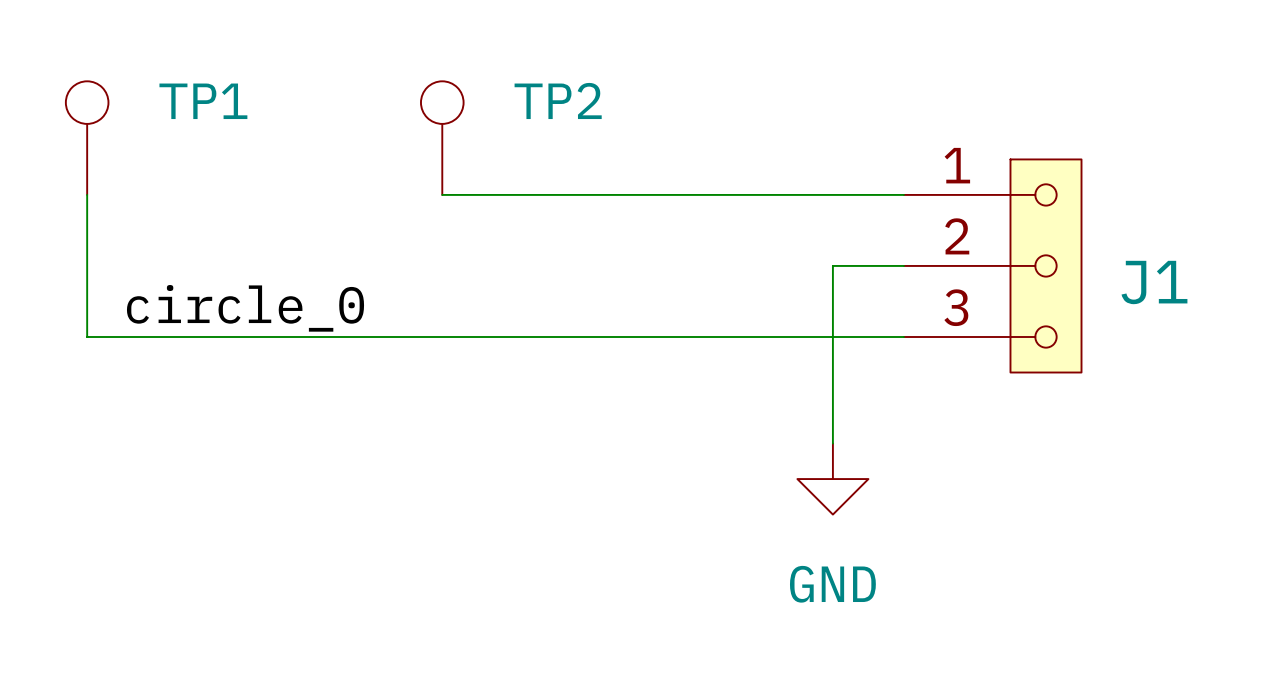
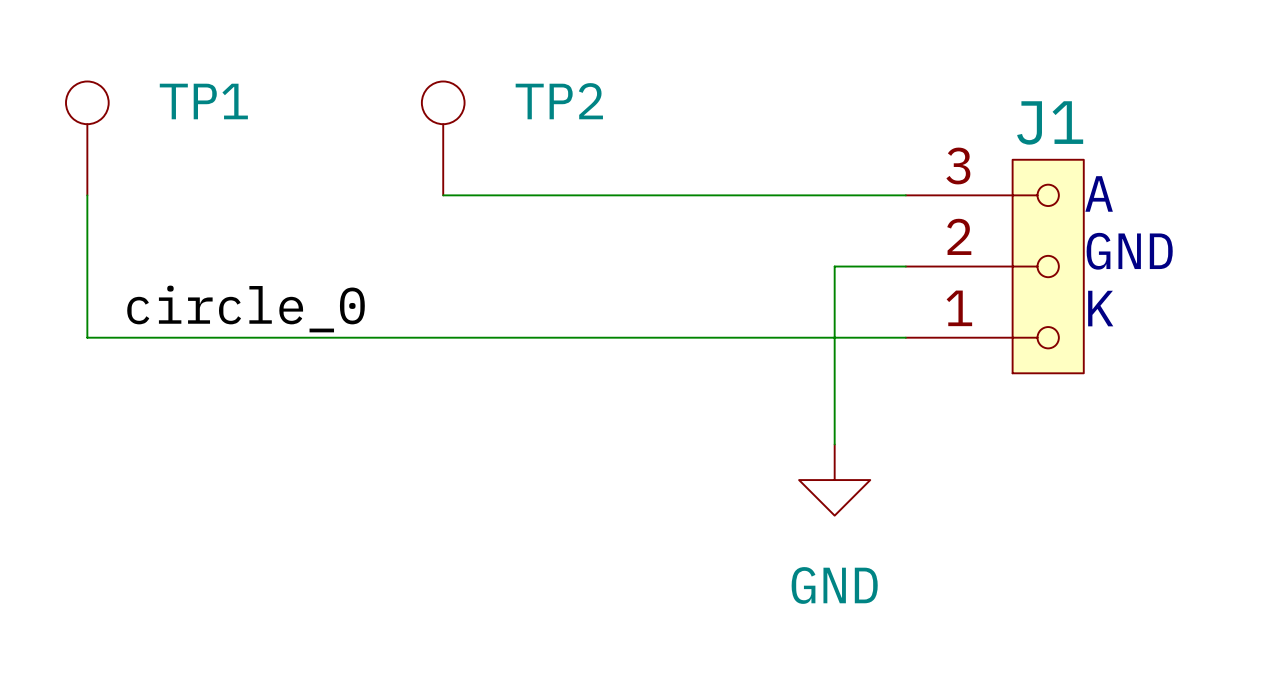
text: none -> A (1099, 193)
text: none -> GND (1129, 251)
J1 flip: as is (1045, 265) -> up-down (1048, 266)
J1 name position: J1 (1154, 282) -> J1 (1050, 122)
text: none -> K (1100, 308)

